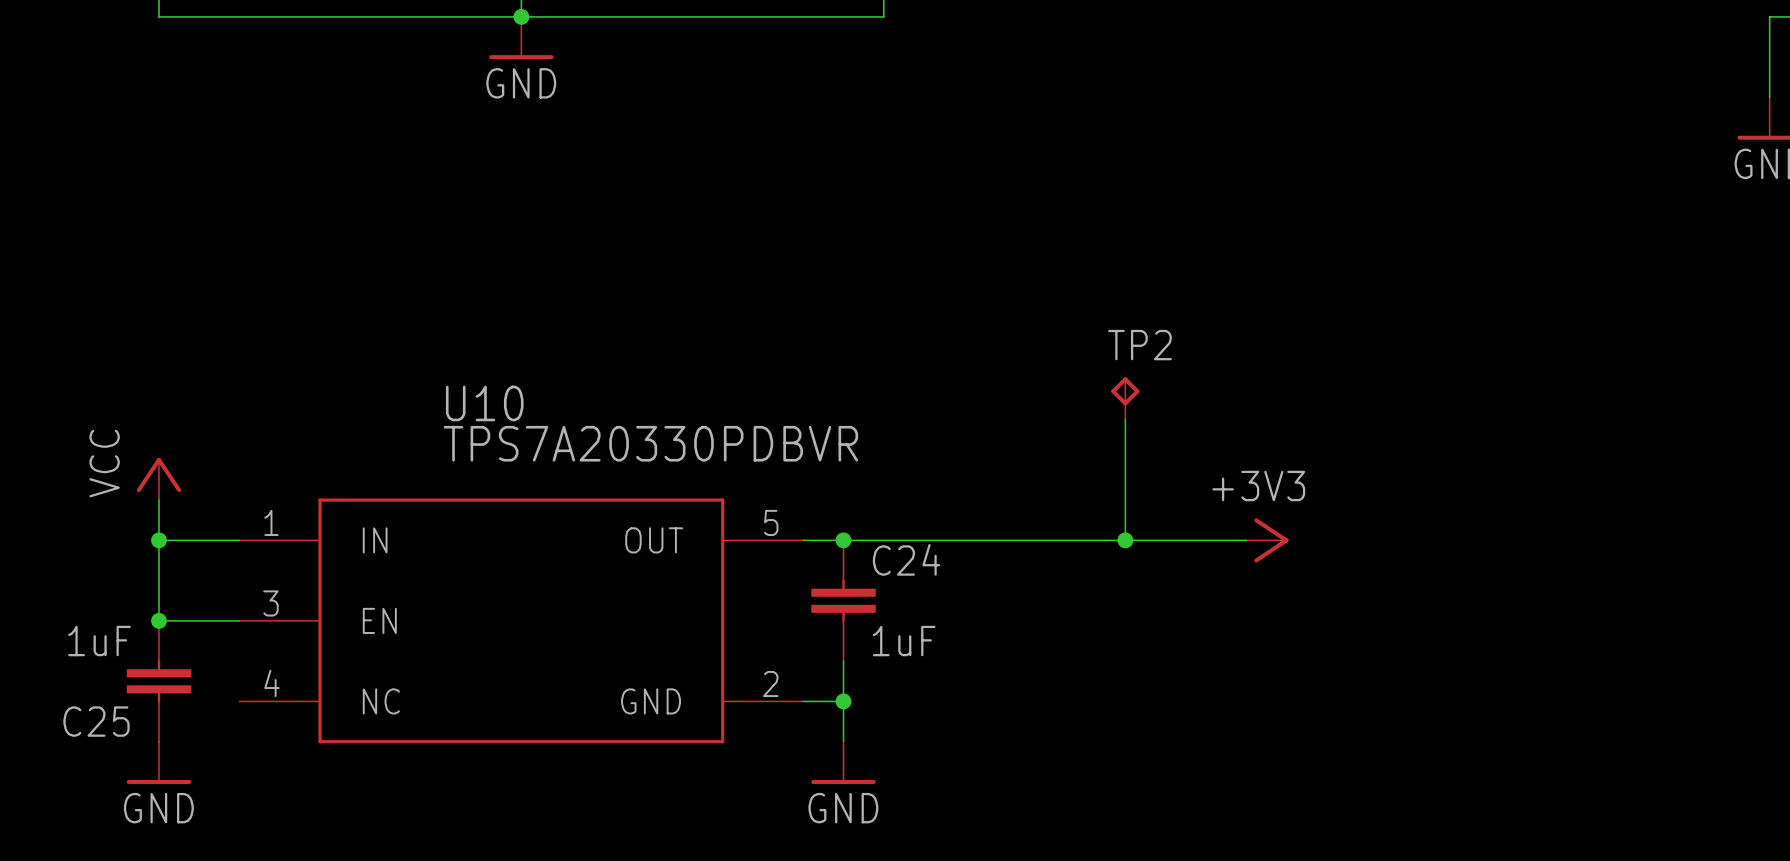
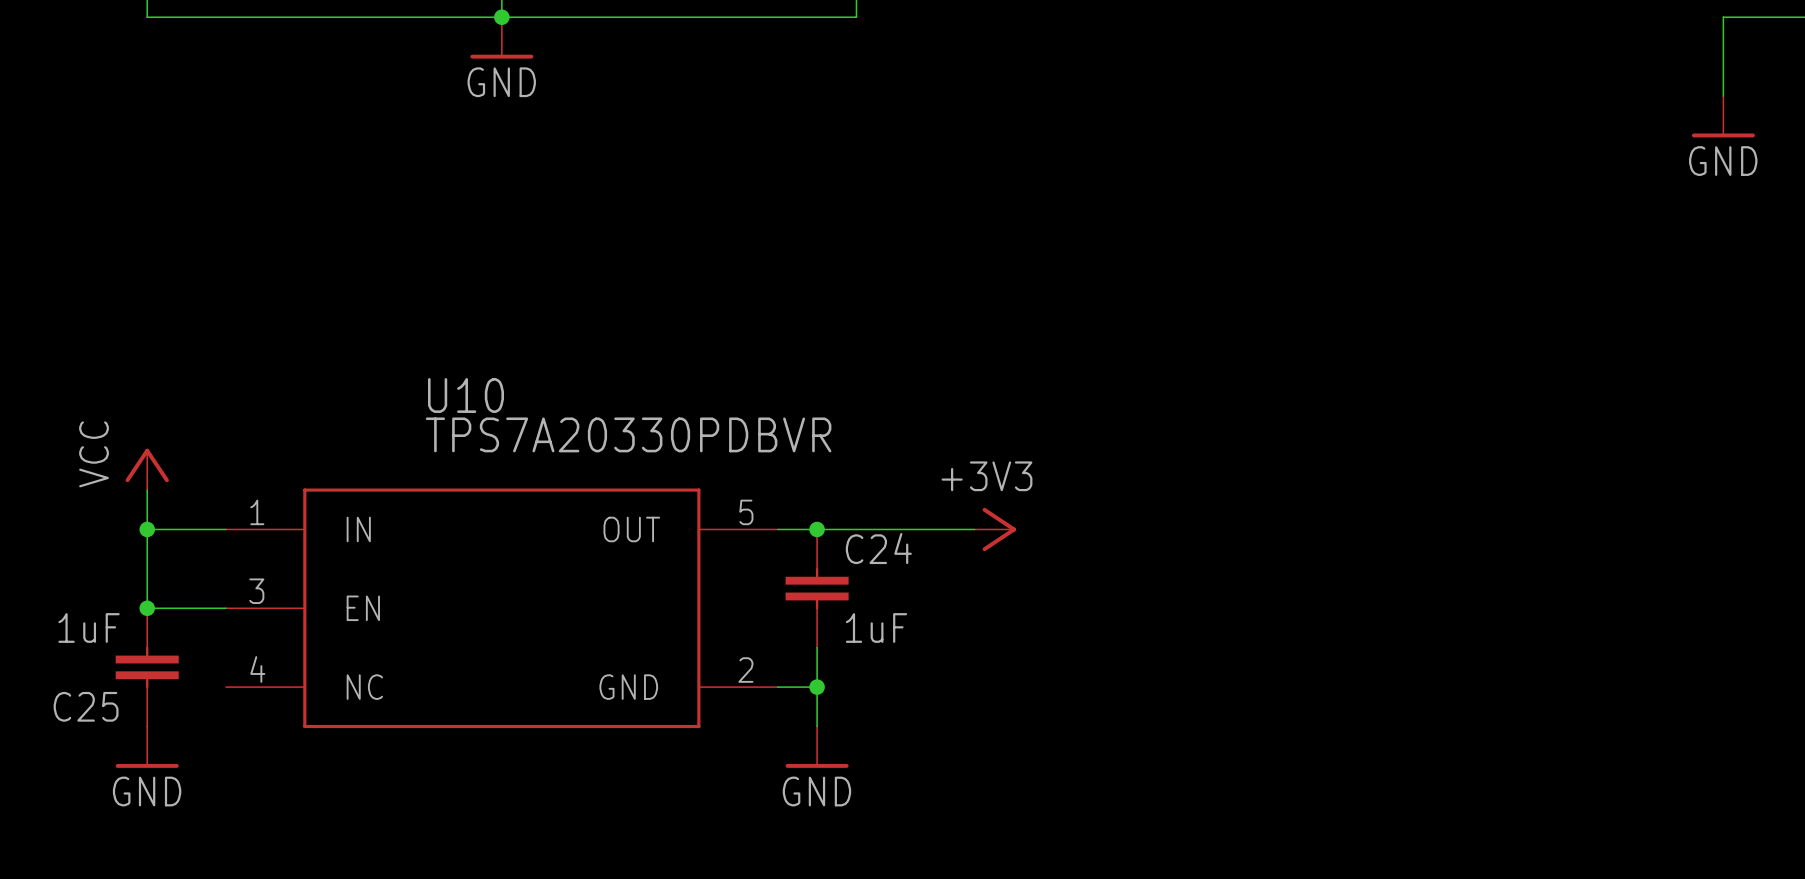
TP2: (1125, 398) -> none
wire: (1125, 419) (1125, 540) -> none
wire: (1004, 540) (1246, 540) -> none
junction: (1125, 540) -> none
power symbol position: +3V3 (1267, 540) -> +3V3 (995, 529)

